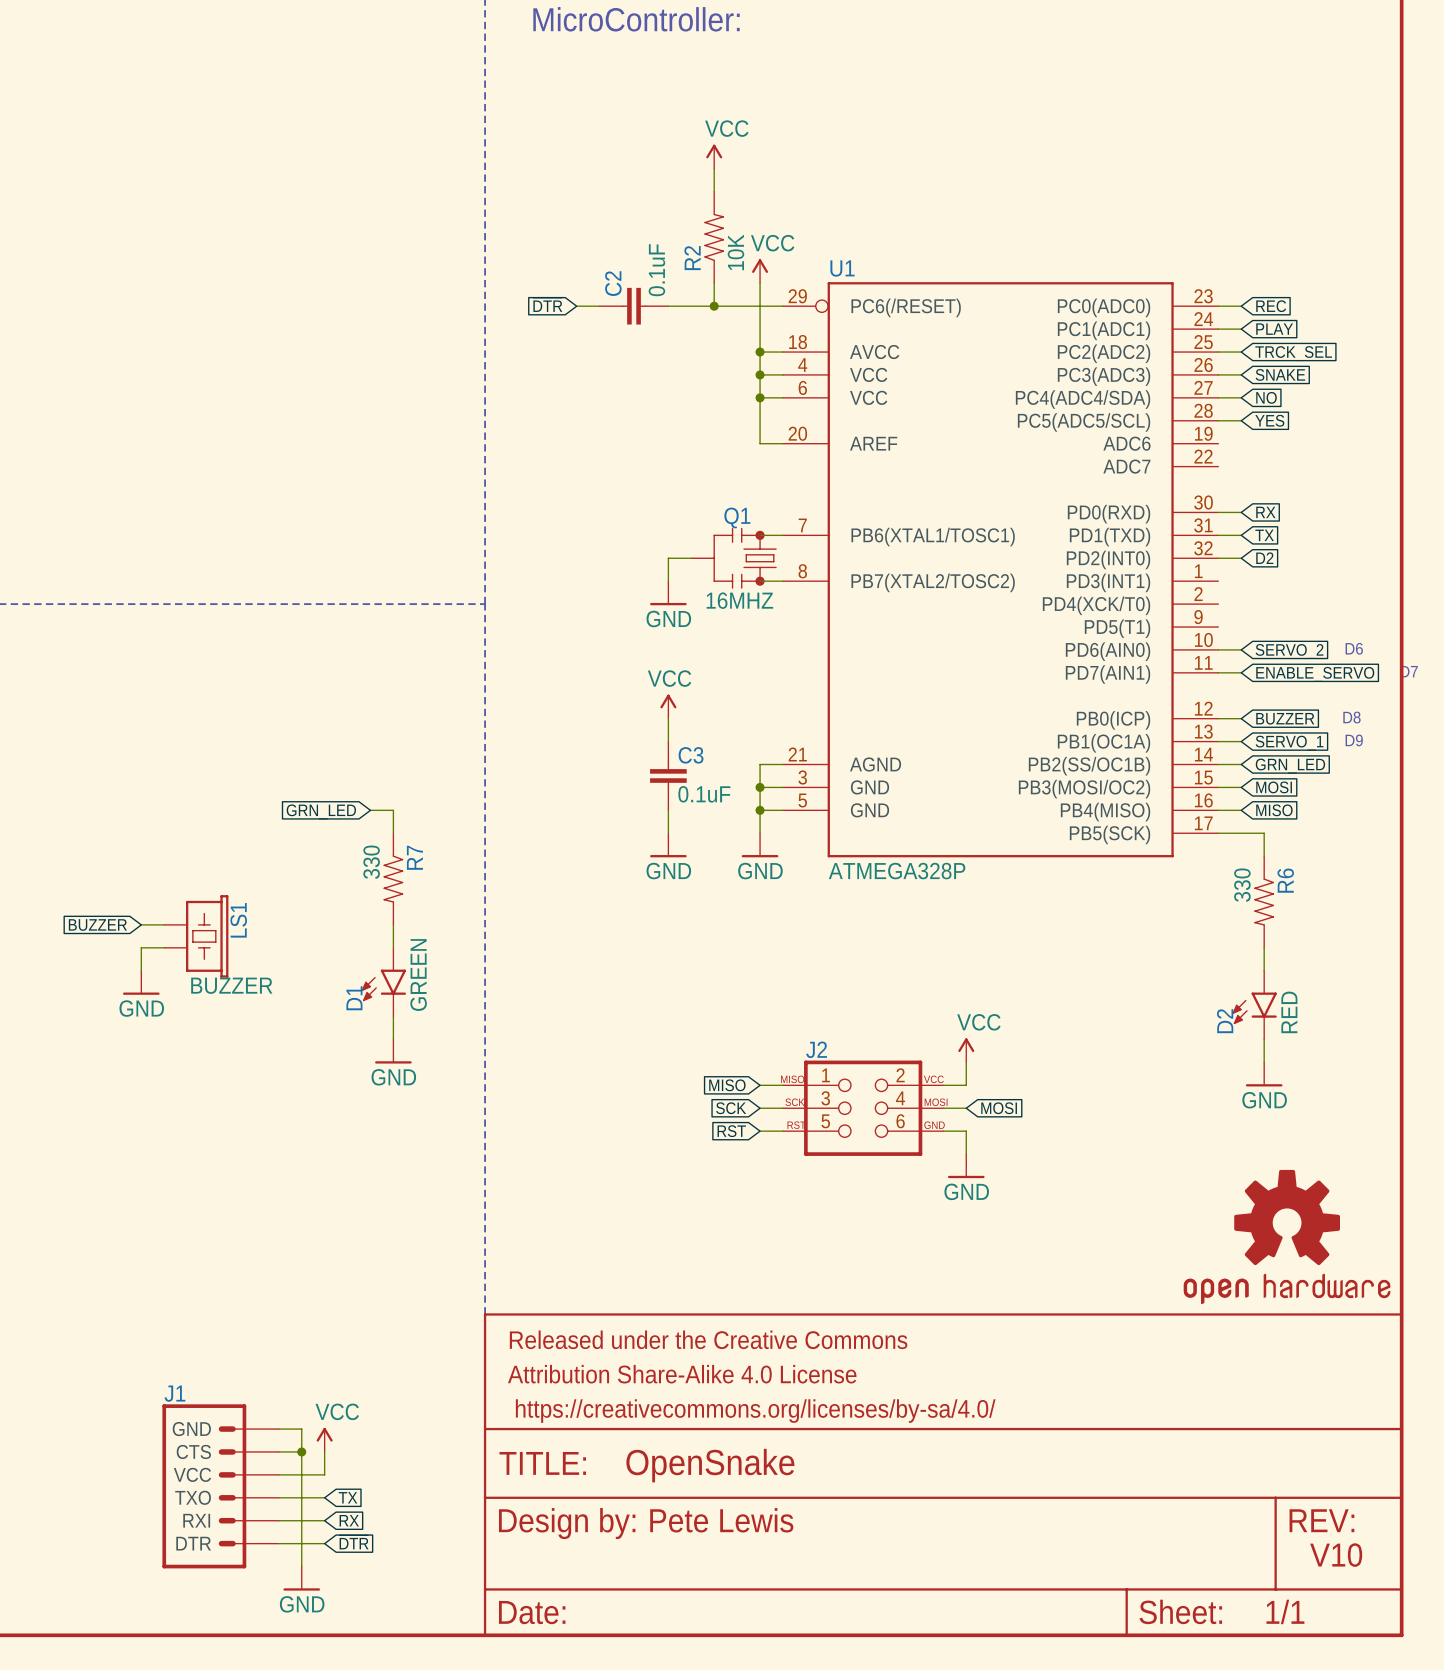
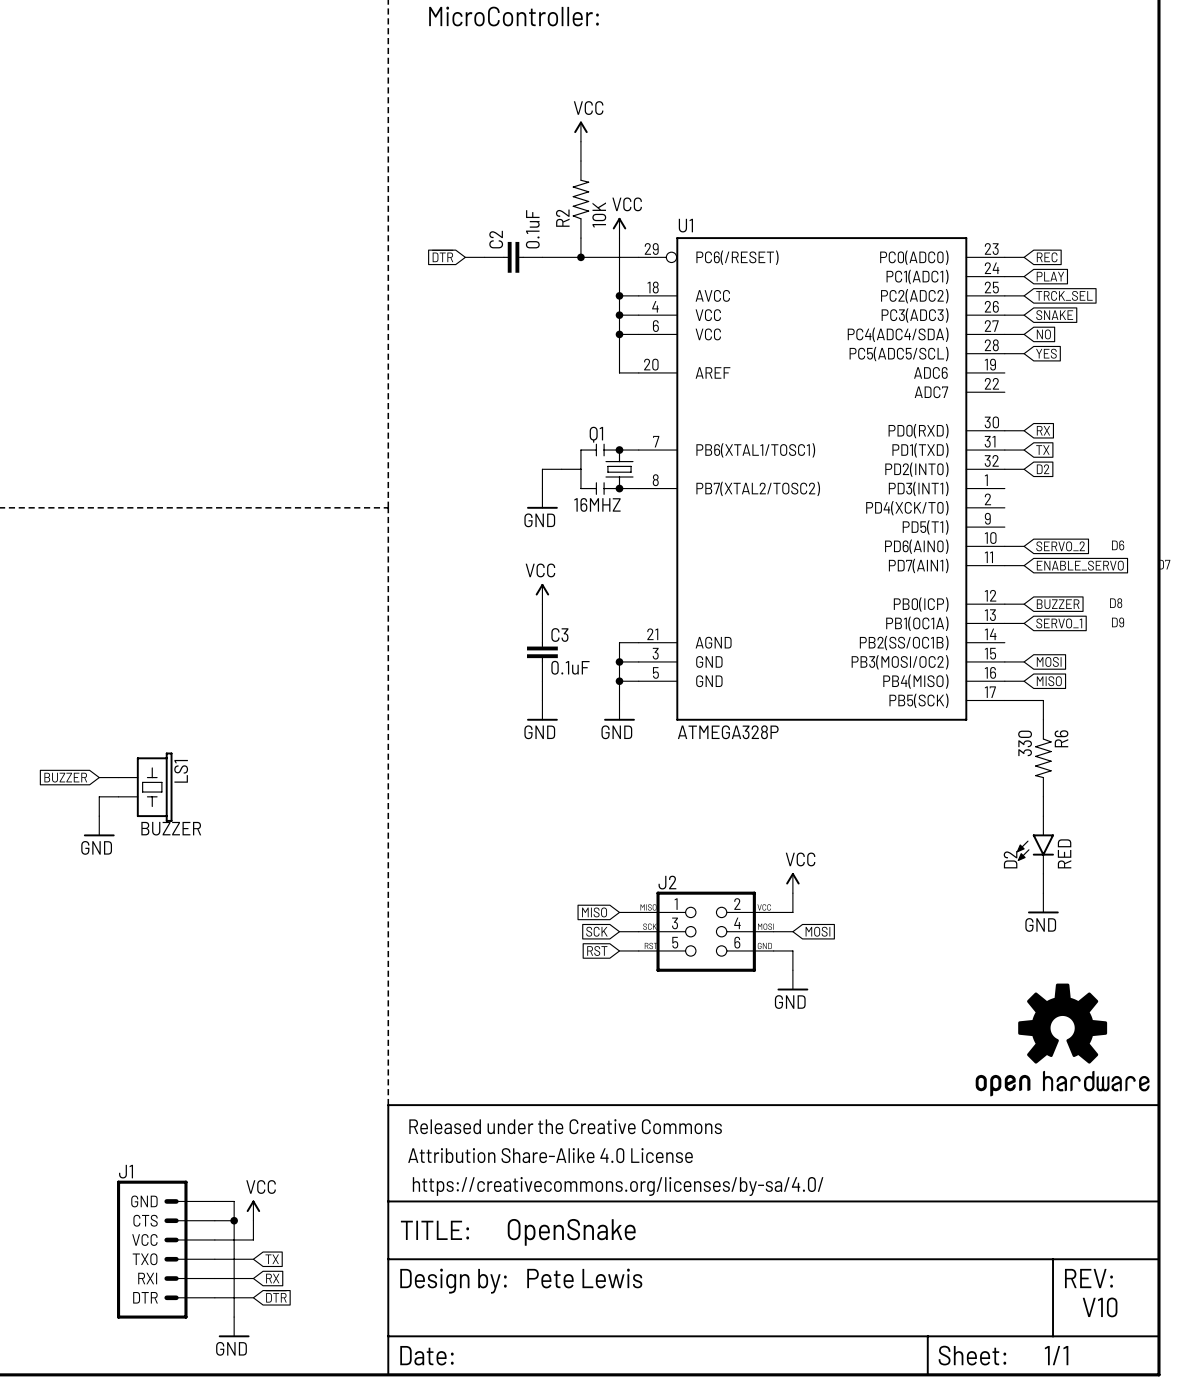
wire: (1218, 764) (1241, 764) -> none
global label: GRN_LED (1290, 766) -> none
wire: (370, 810) (393, 810) (393, 833) -> none
global label: GRN_LED (321, 811) -> none
R7: 330 (393, 879) -> none
wire: (393, 924) (393, 947) -> none
D1: GREEN (383, 982) -> none
wire: (393, 1016) (393, 1039) -> none
power symbol: GND (393, 1051) -> none

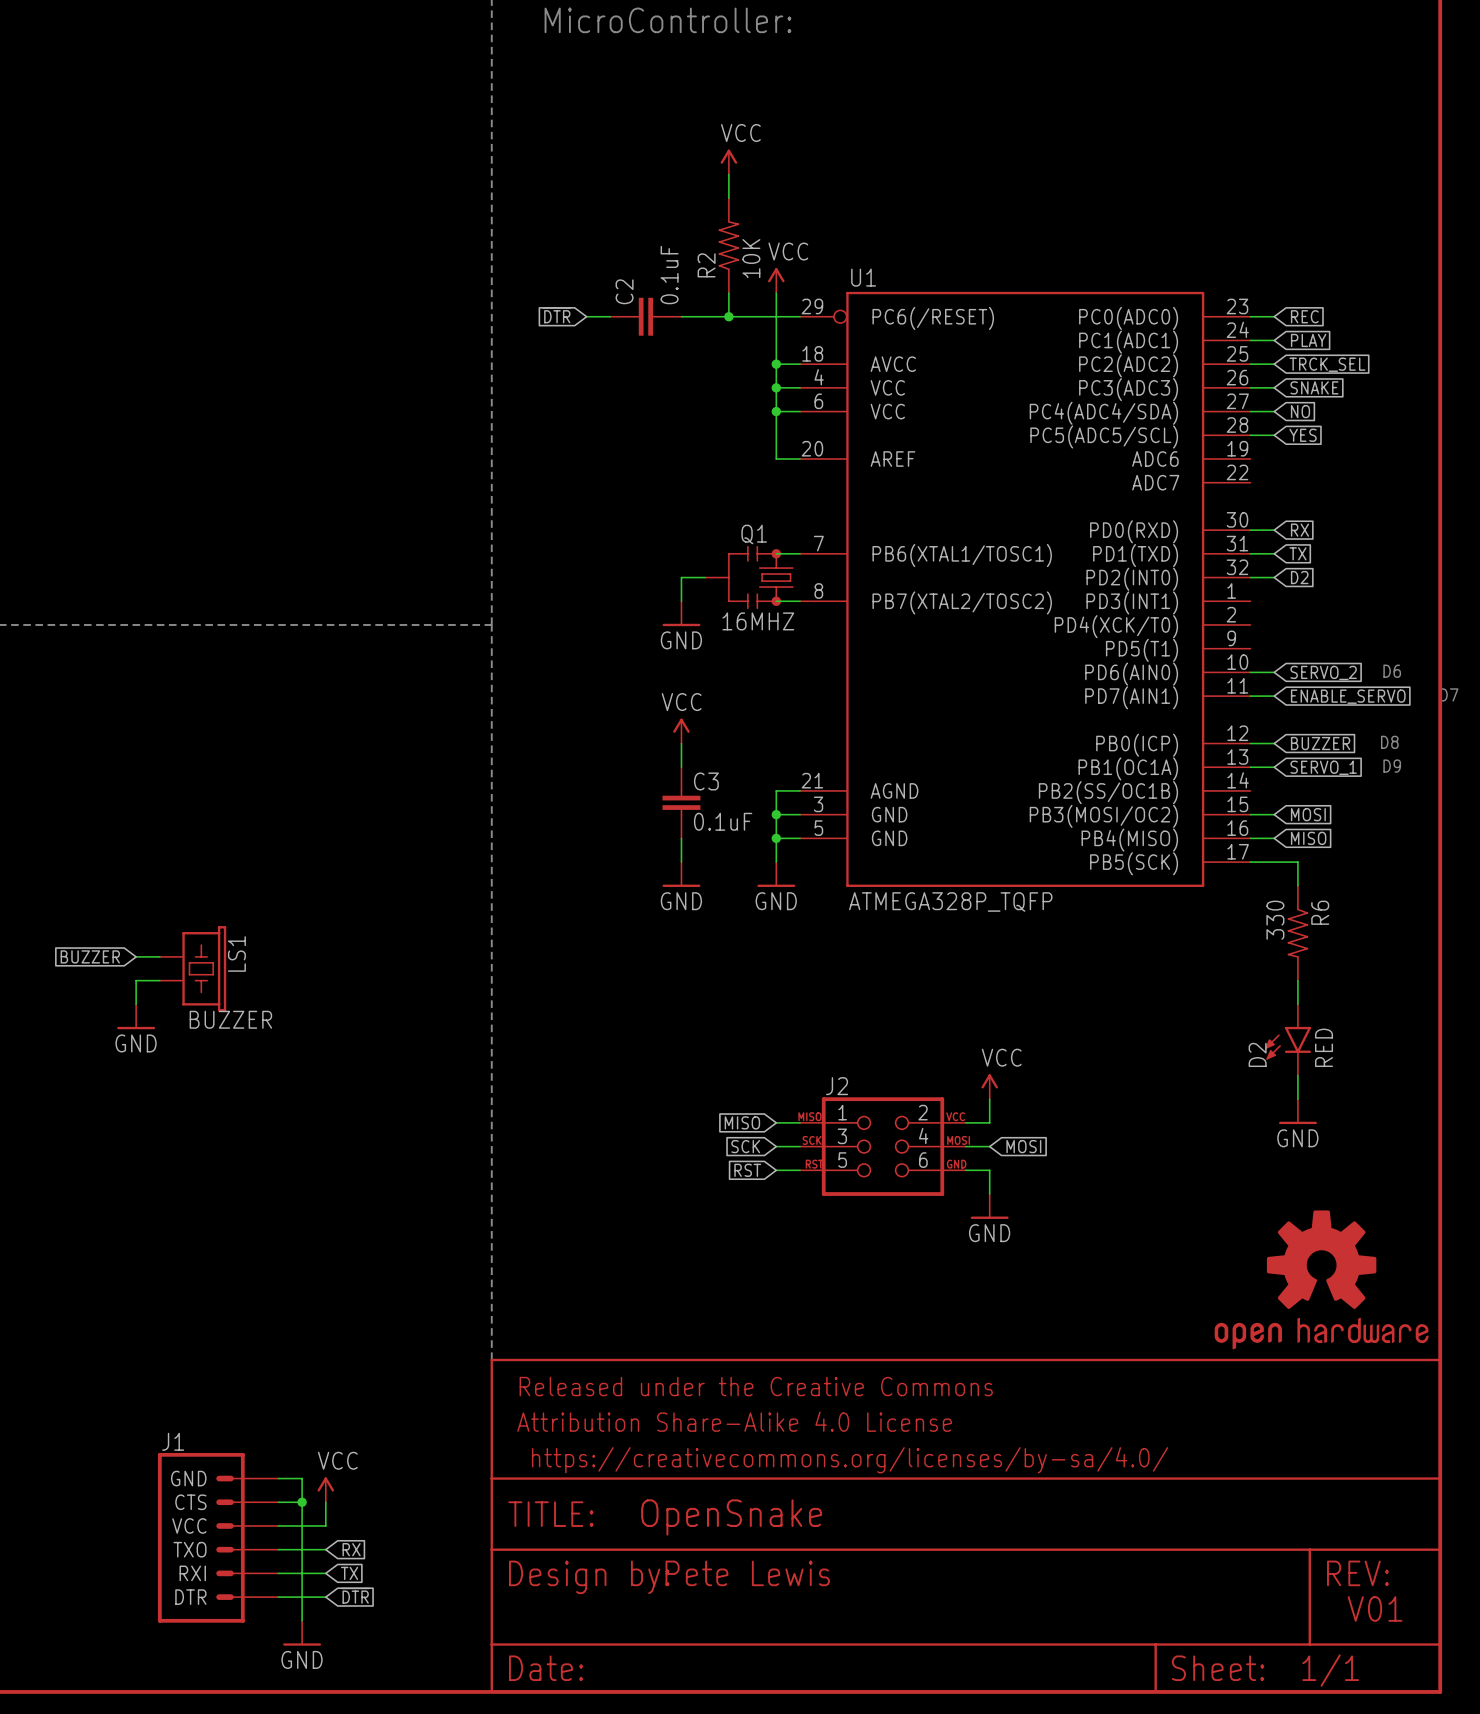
U1 value: ATMEGA328P (728, 732) -> ATMEGA328P_TQFP (950, 901)
global label: TX (272, 1259) -> RX (351, 1549)
global label: RX (272, 1278) -> TX (349, 1573)
text: V10 (1100, 1307) -> V01 (1375, 1608)

